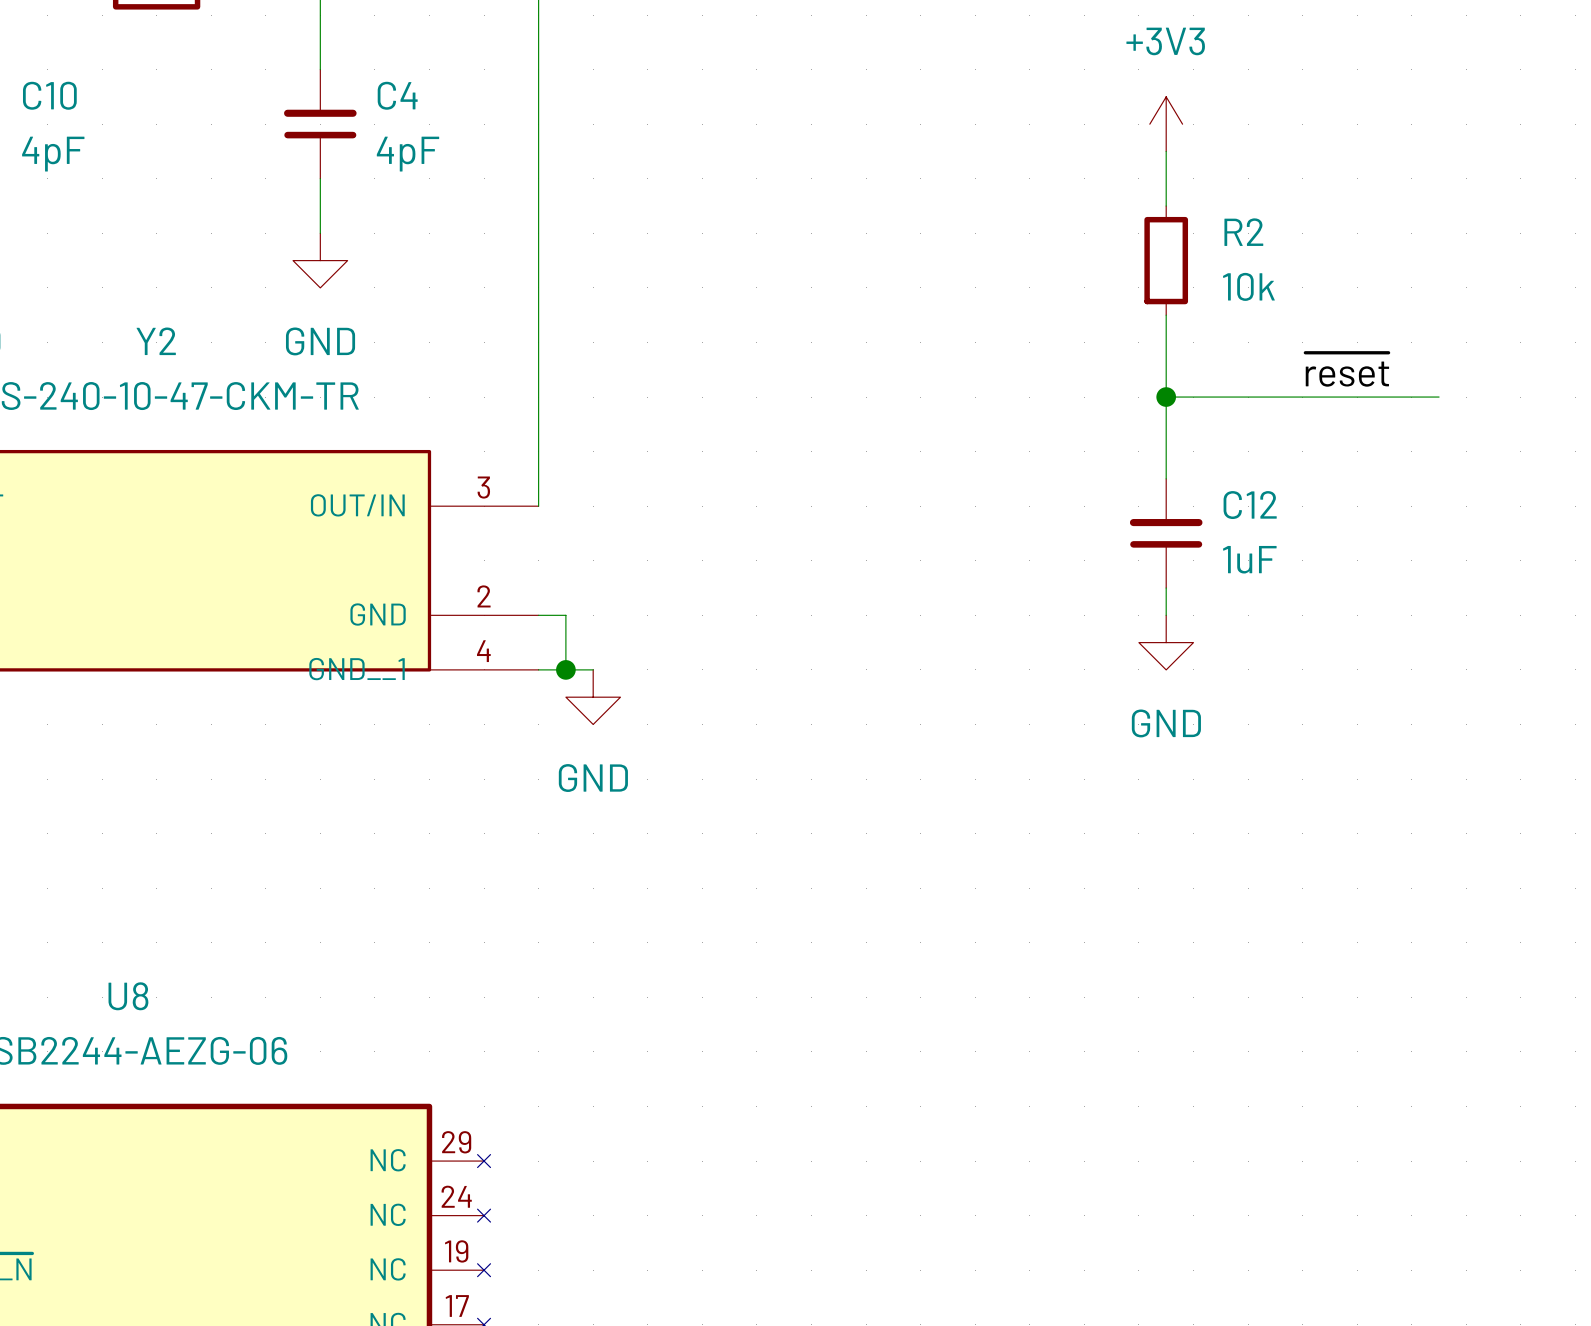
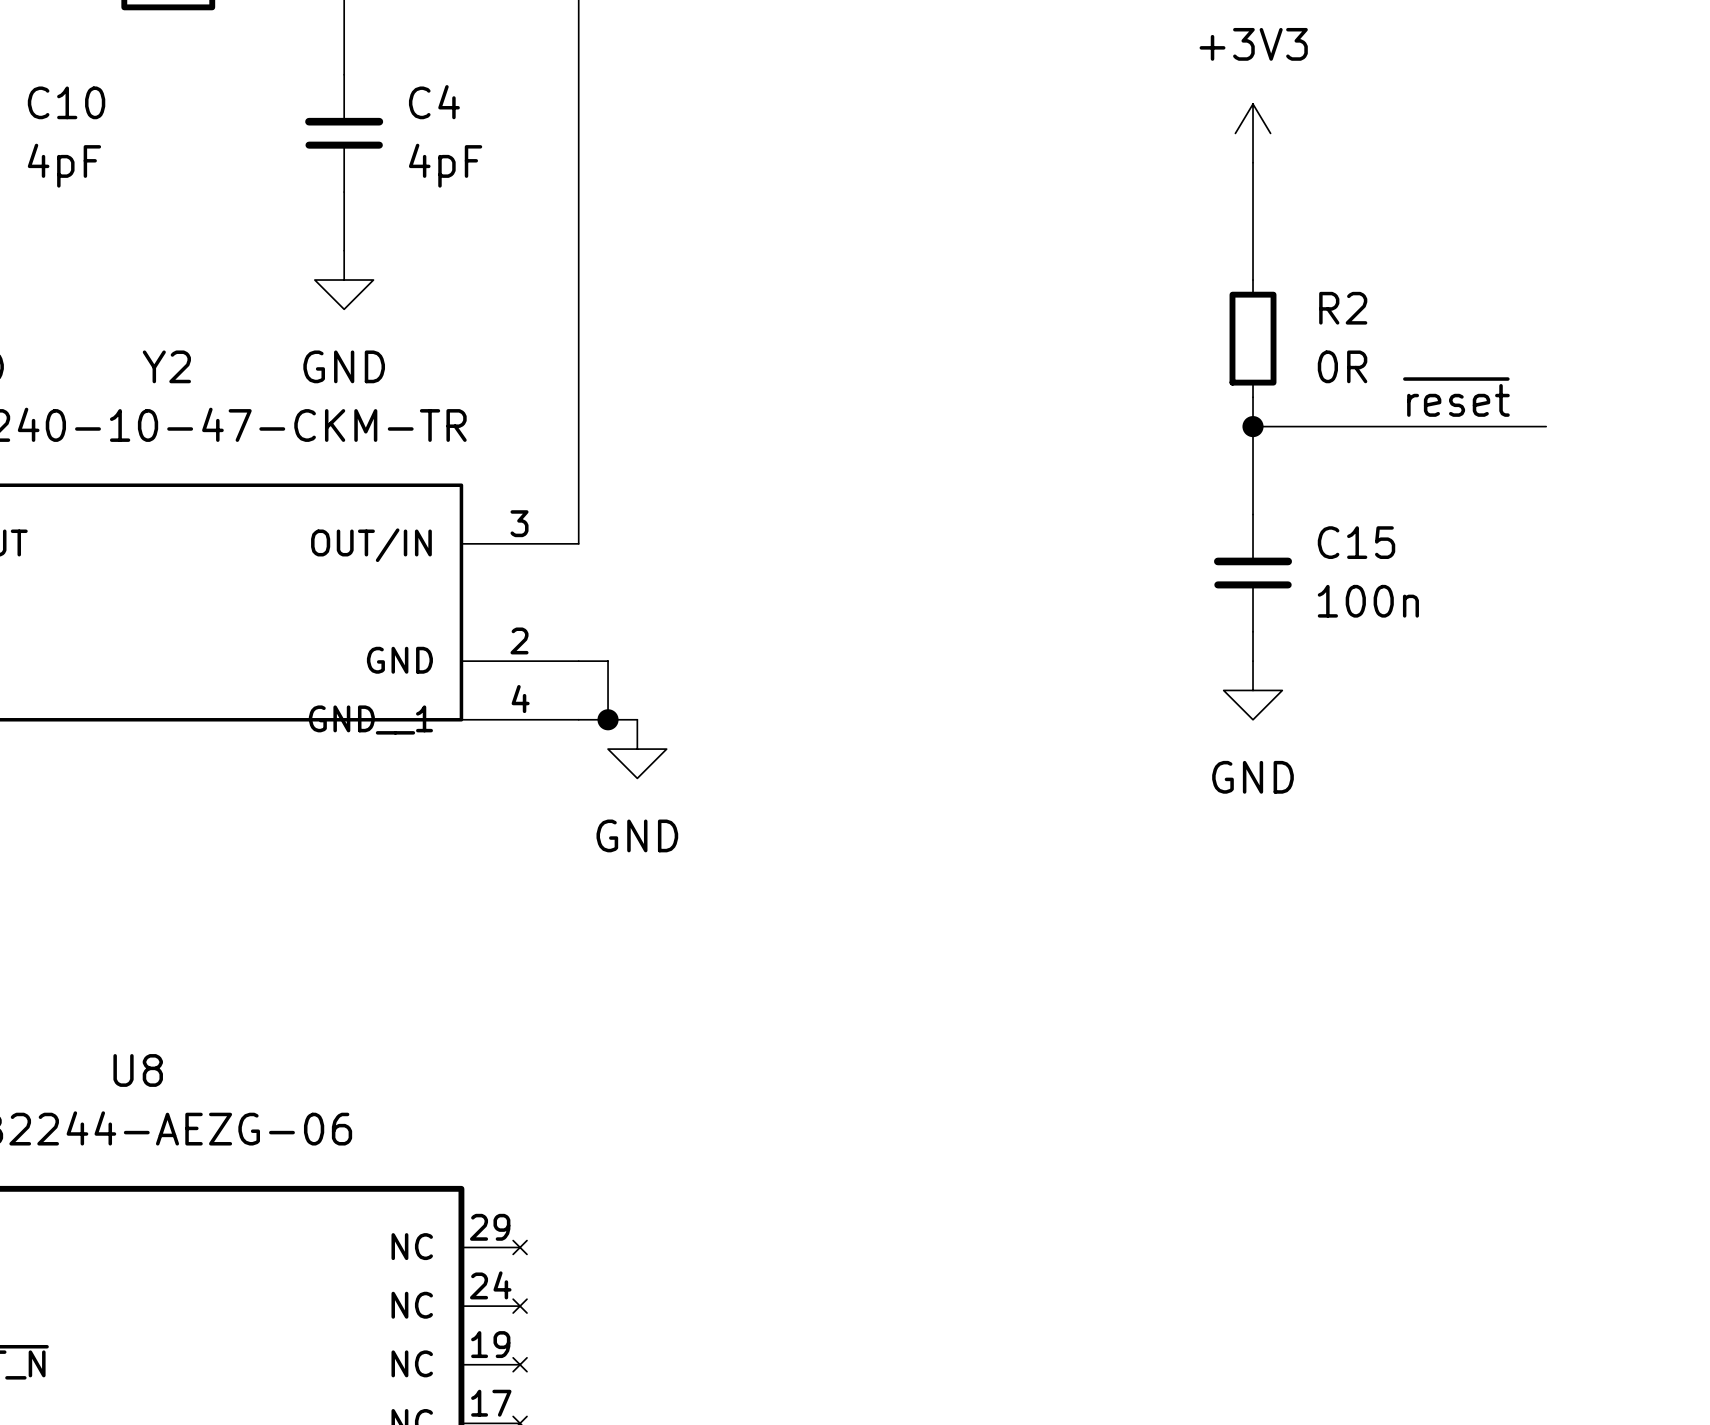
R2 position: (1166, 260) -> (1253, 338)
R2 text: 10k (1248, 286) -> 0R (1342, 366)
wire: (1166, 315) (1166, 369) -> (1253, 221) (1253, 280)
C12 name: C12 (1250, 505) -> C15 (1356, 542)
C12 text: 1uF (1249, 559) -> 100n (1368, 601)

